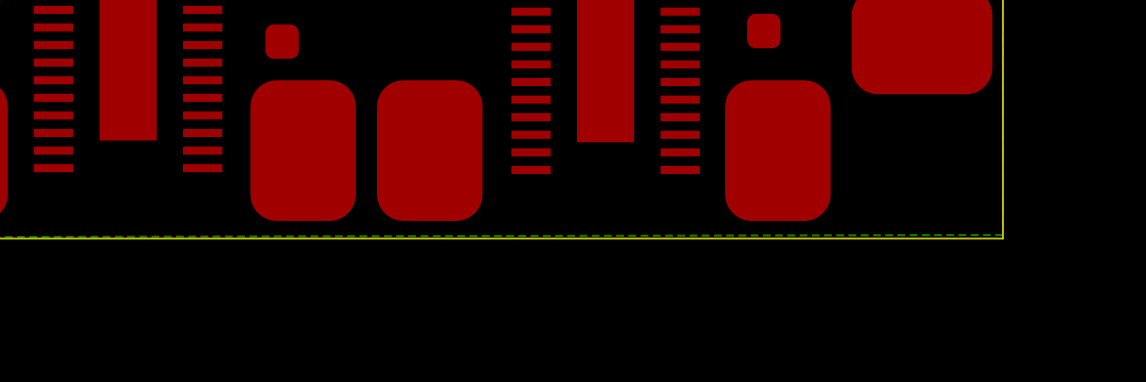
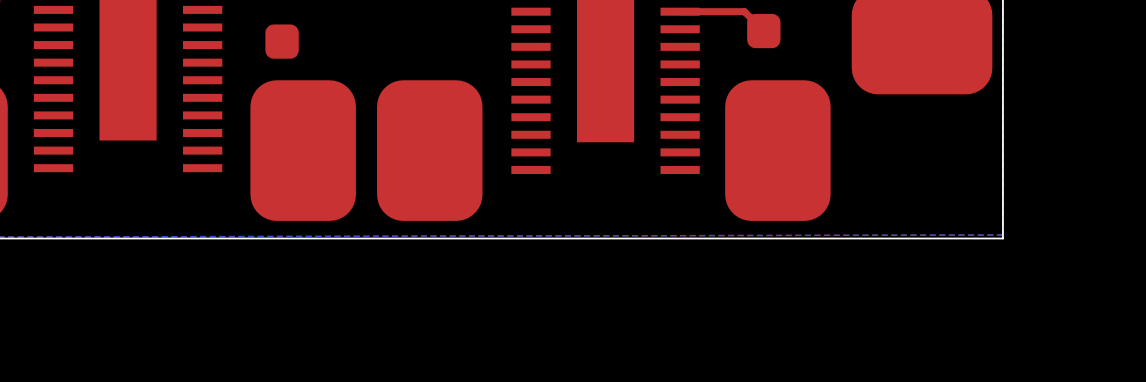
top track: none -> (680, 11) (744, 11) (763, 31)

